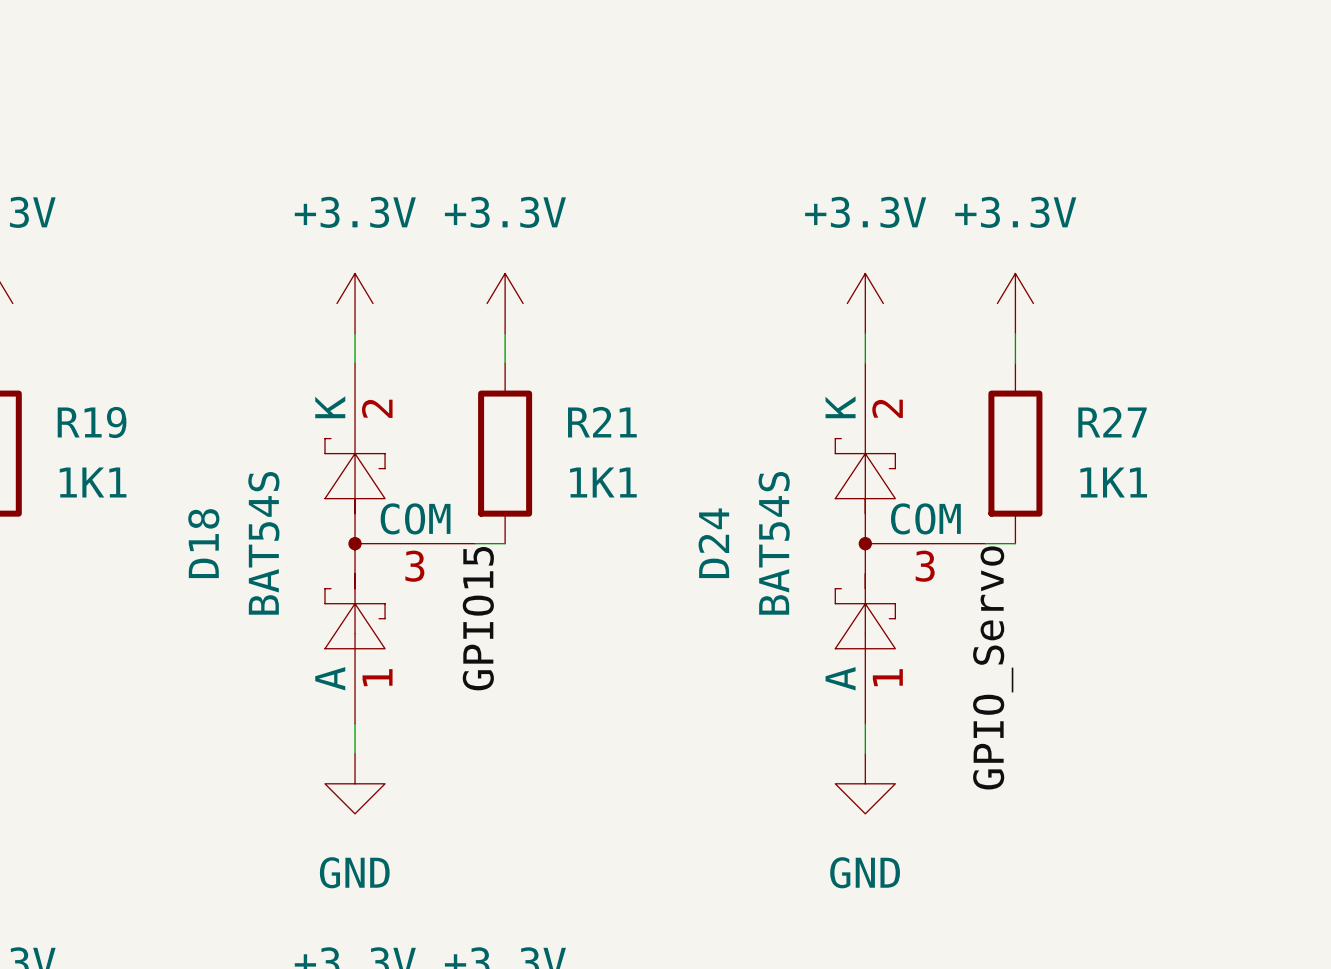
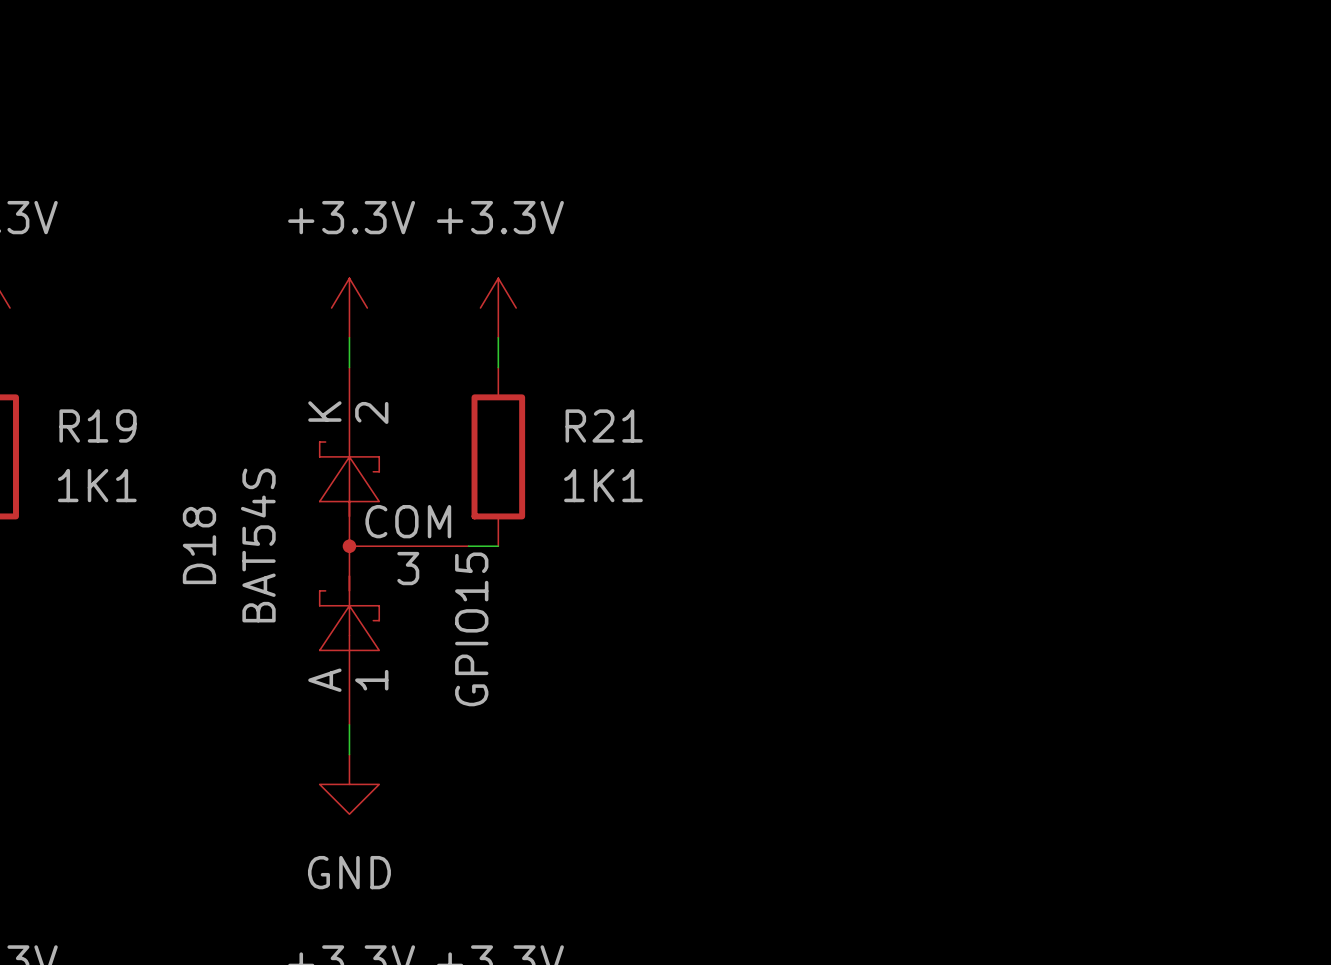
power symbol: +3.3V (865, 303) -> none
power symbol: +3.3V (1015, 303) -> none
wire: (865, 333) (865, 363) -> none
wire: (1015, 333) (1015, 363) -> none
R27: 1K1 (1015, 453) -> none
D24: BAT54S (910, 543) -> none
wire: (985, 543) (1015, 543) -> none
label: GPIO_Servo (993, 667) -> none
wire: (865, 723) (865, 753) -> none
power symbol: GND (865, 783) -> none

